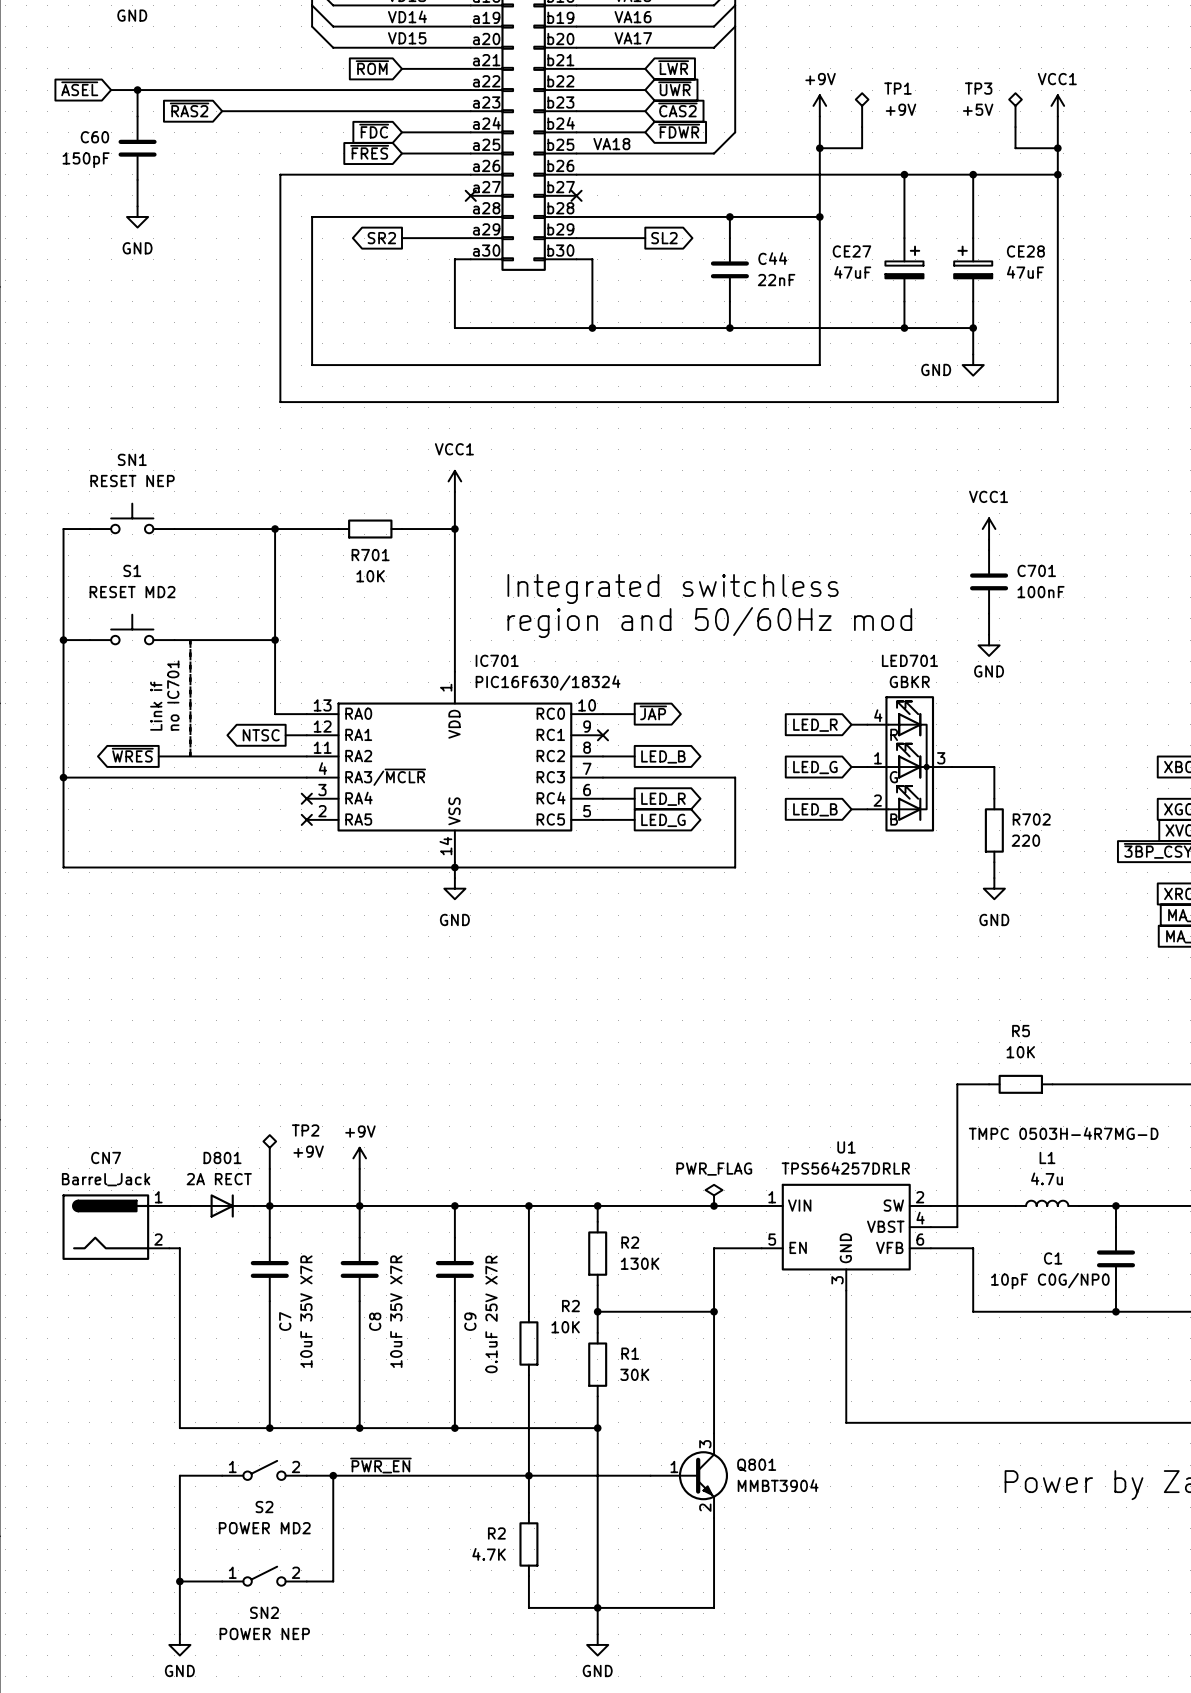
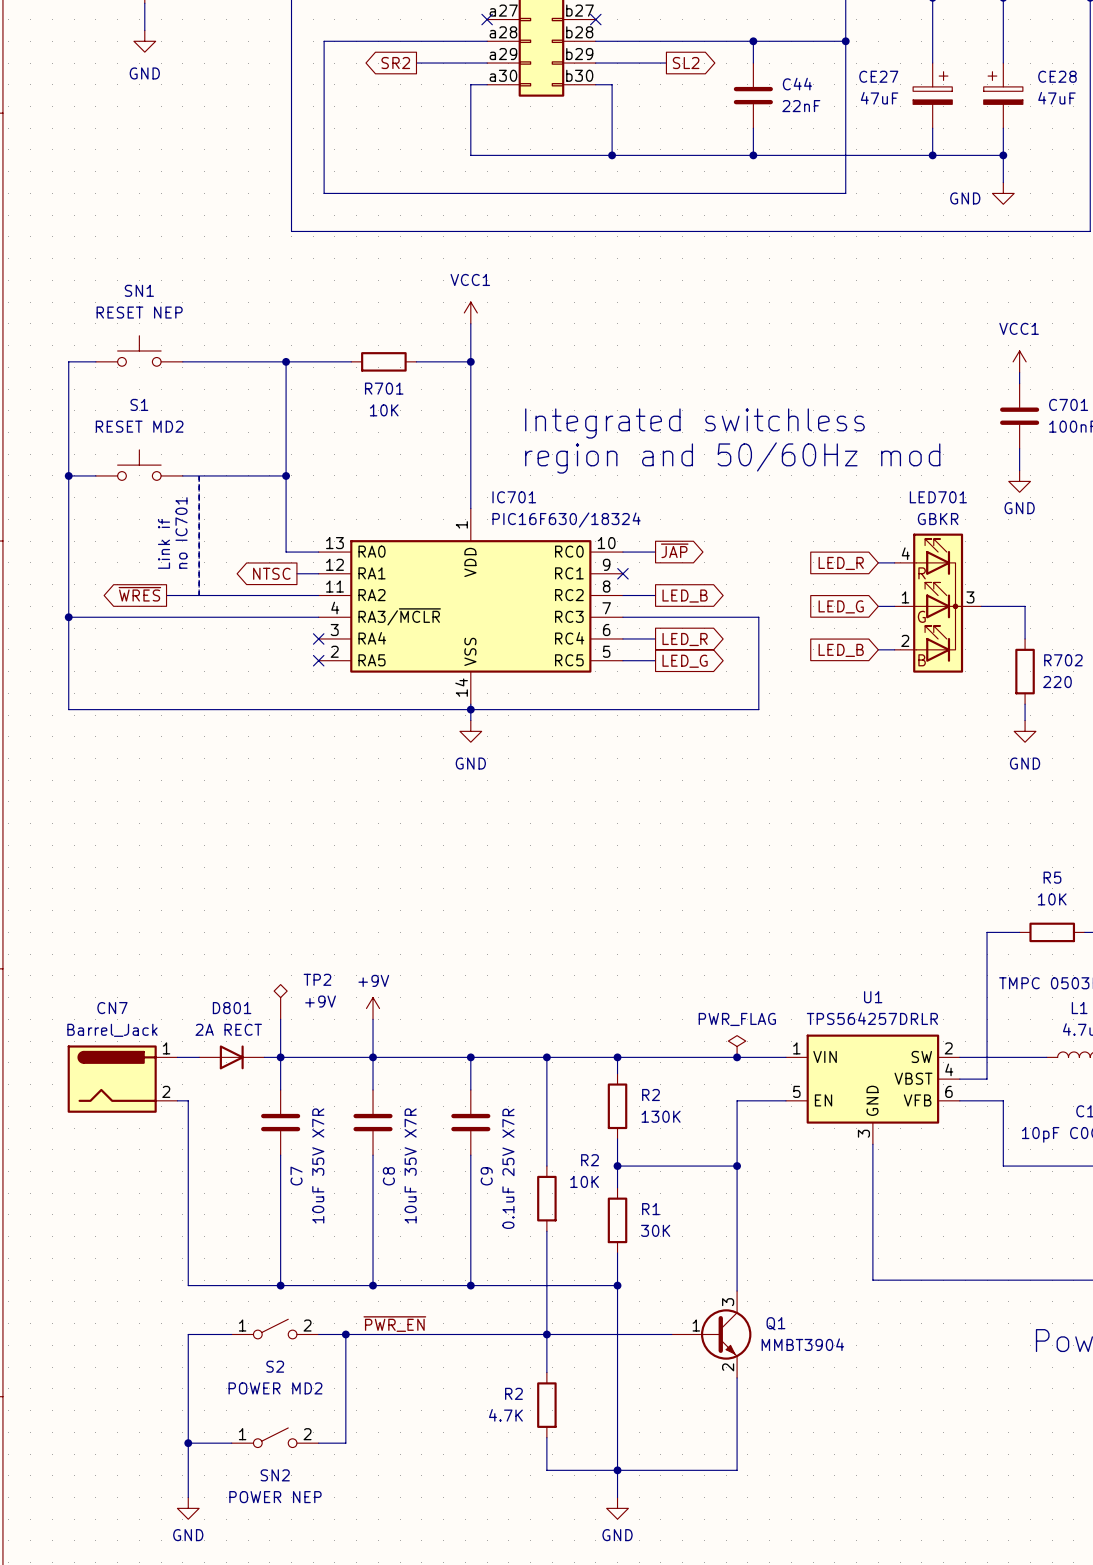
Q801 name: Q801 (756, 1465) -> Q1 (775, 1323)

